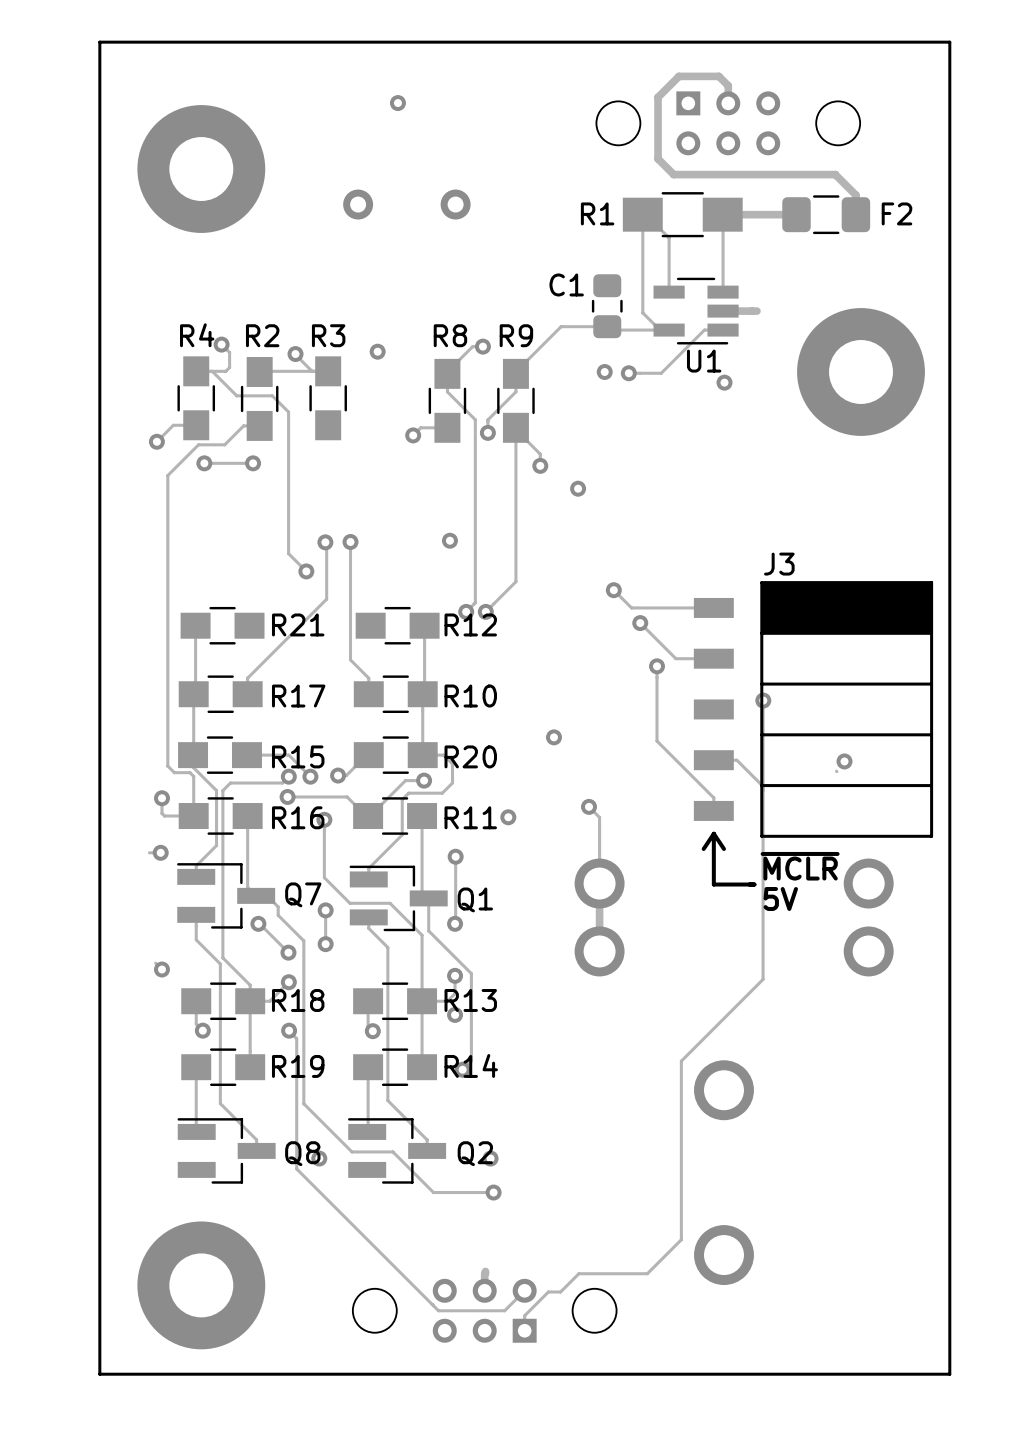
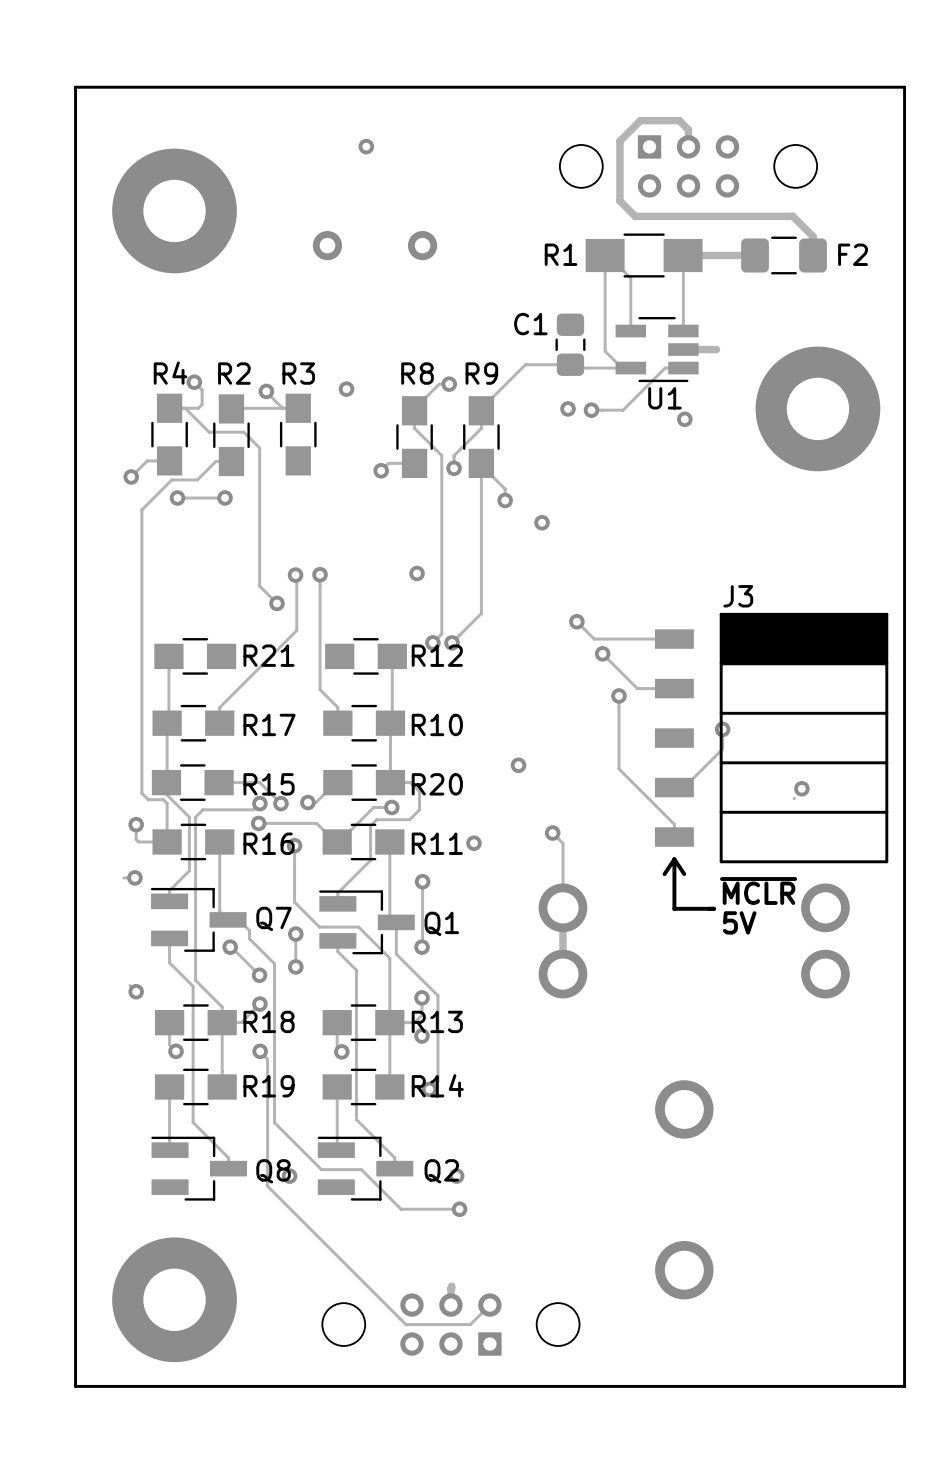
track: (763, 700) (763, 979) (681, 1061) (681, 1239) (647, 1273) (578, 1273) (560, 1292) (548, 1292) (524, 1315) (524, 1330) -> none
track: (723, 760) (736, 760) (763, 786) -> (684, 787) (722, 749) (722, 729)

